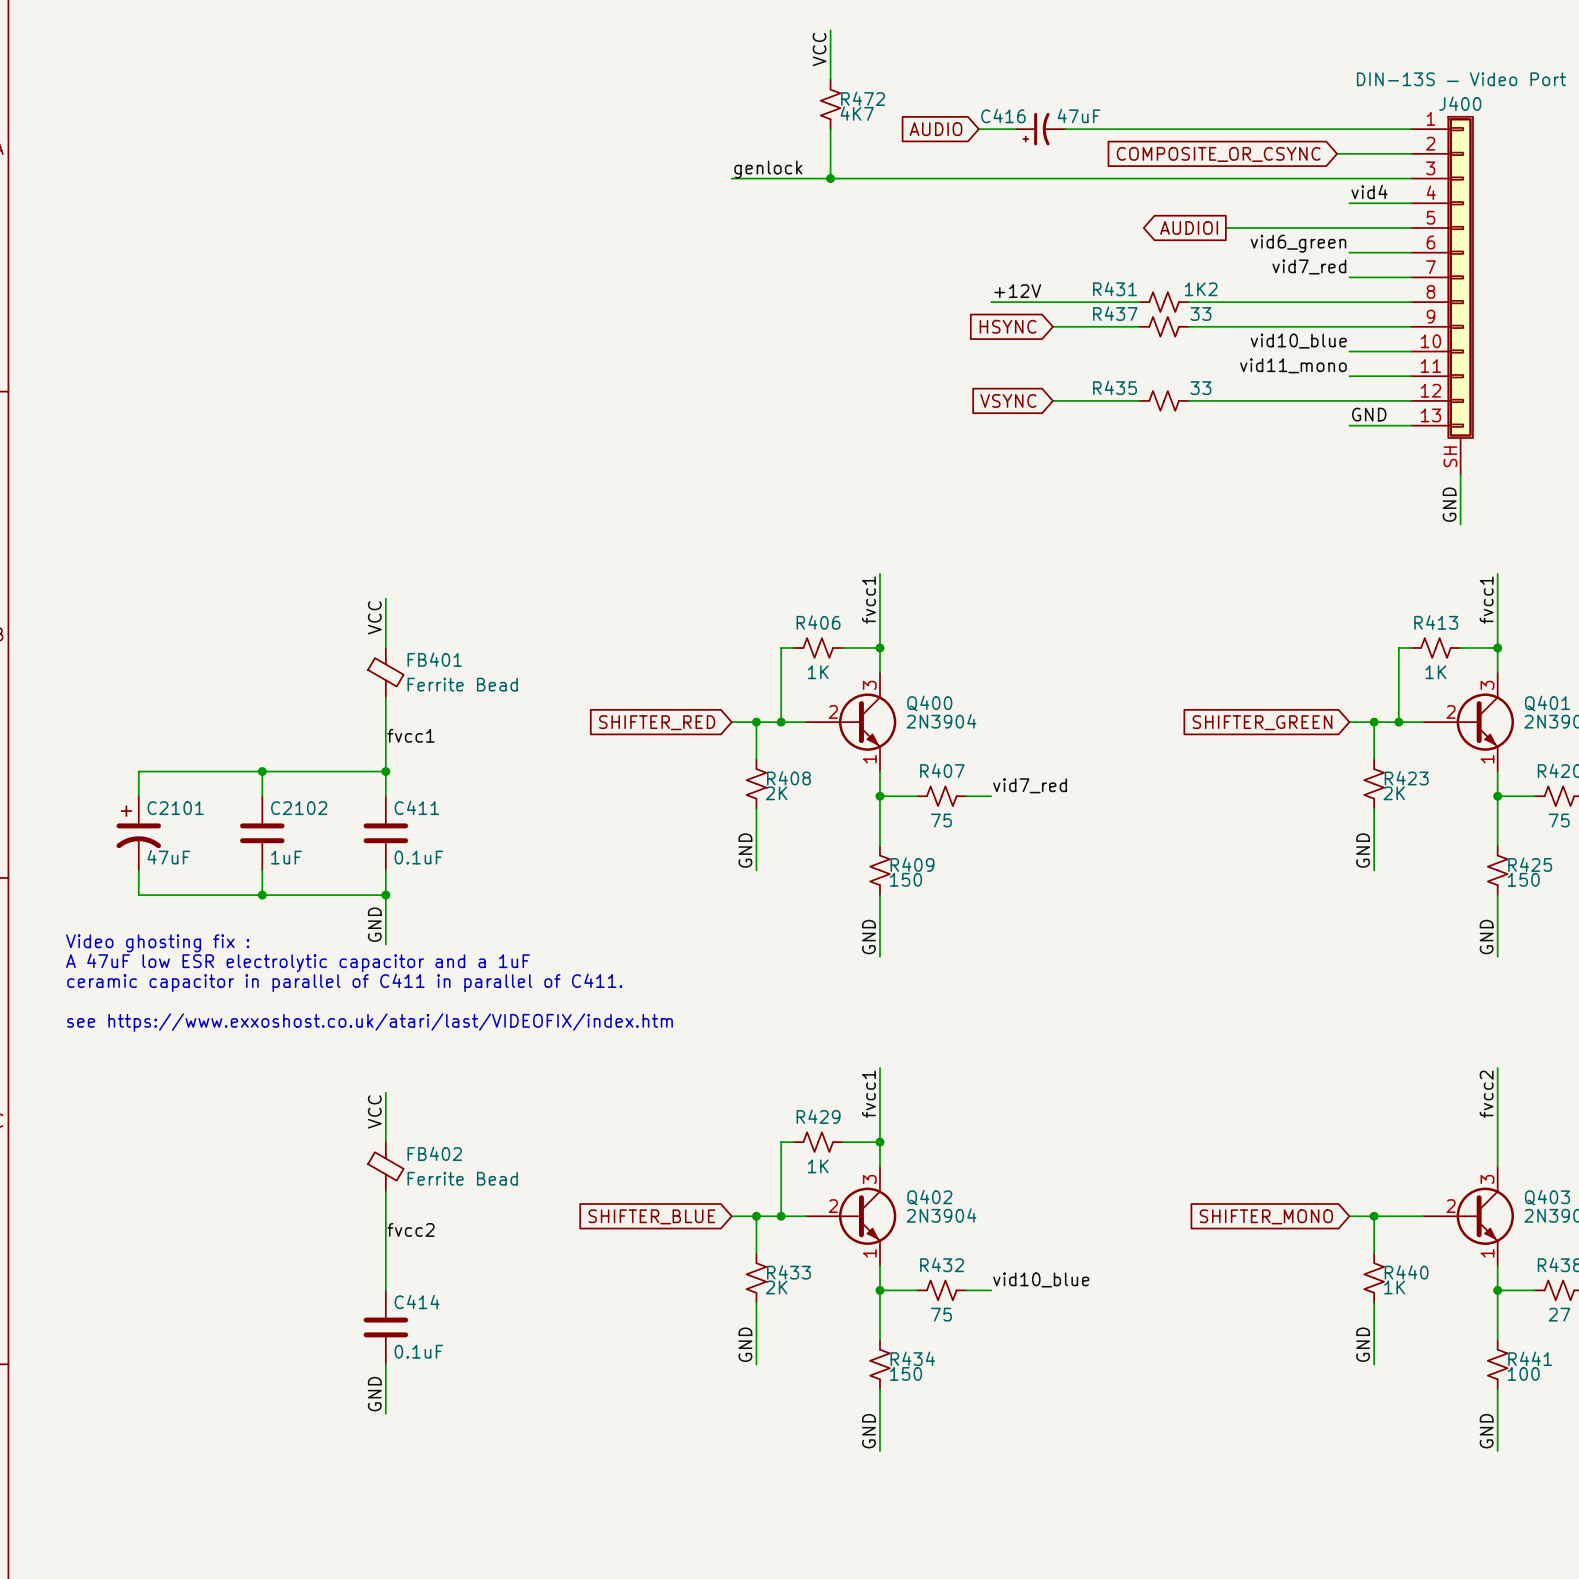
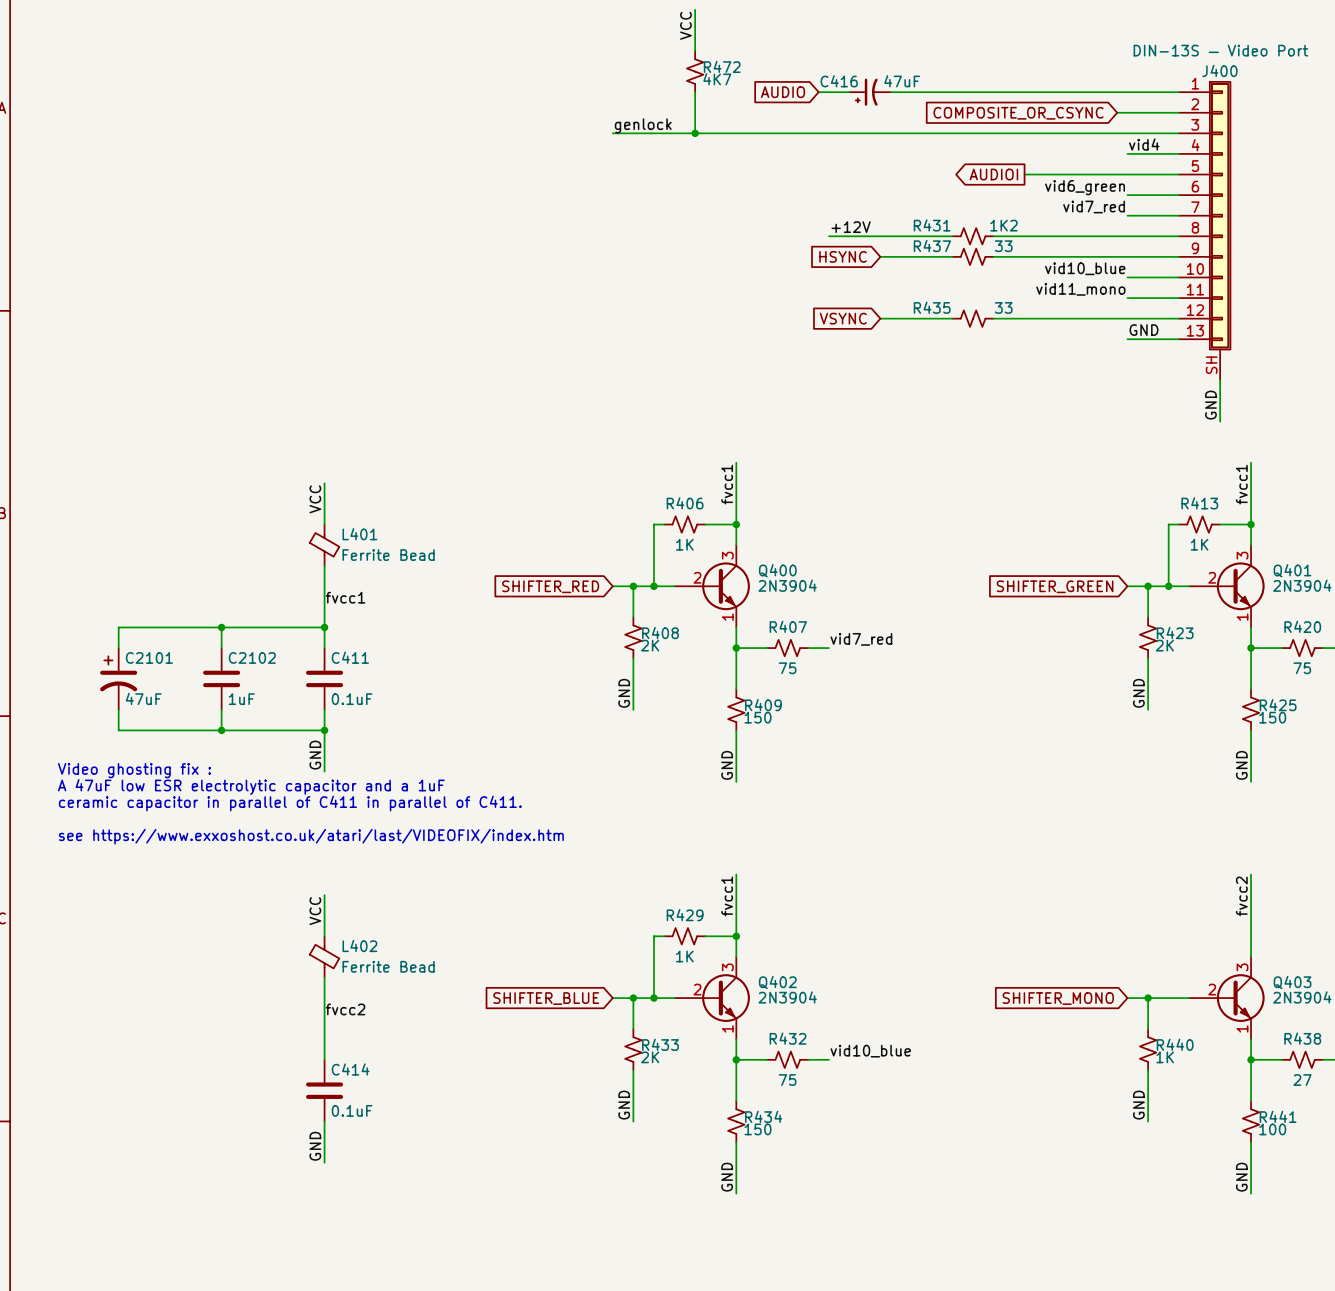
FB401 name: FB401 (434, 659) -> L401 (359, 534)
FB402 name: FB402 (434, 1153) -> L402 (359, 945)

